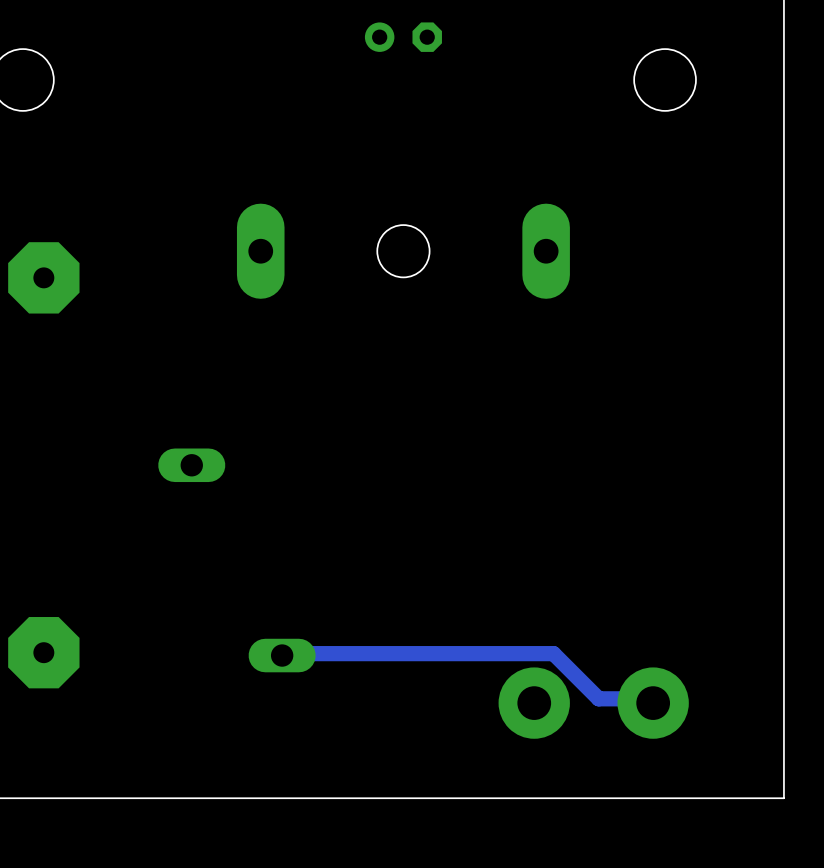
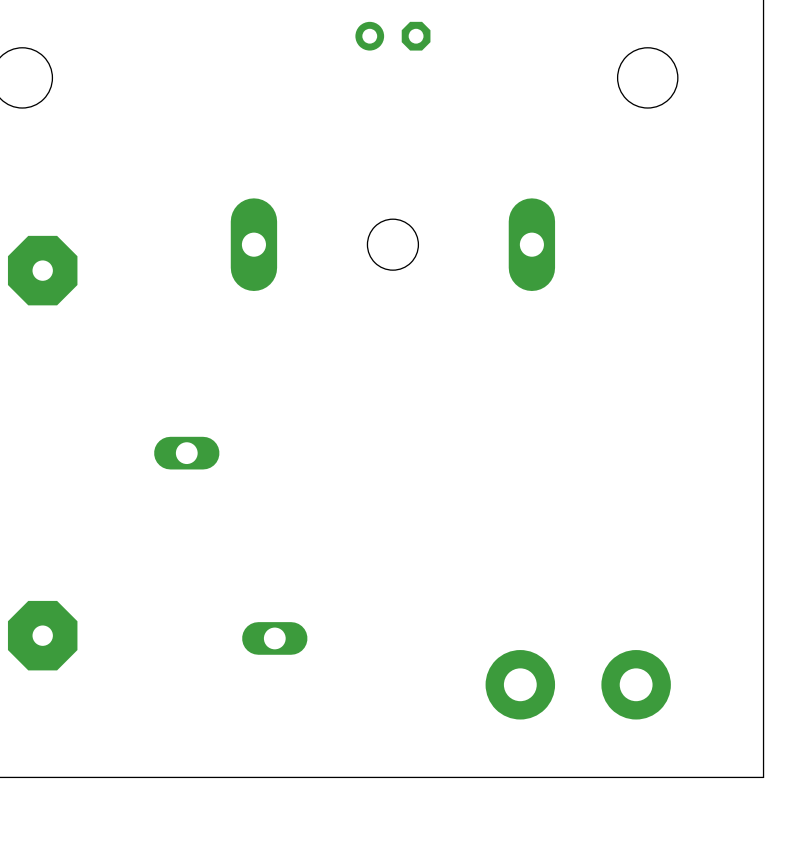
track: (282, 655) (282, 653) (553, 653) (598, 698) (652, 698) (653, 703) -> none

